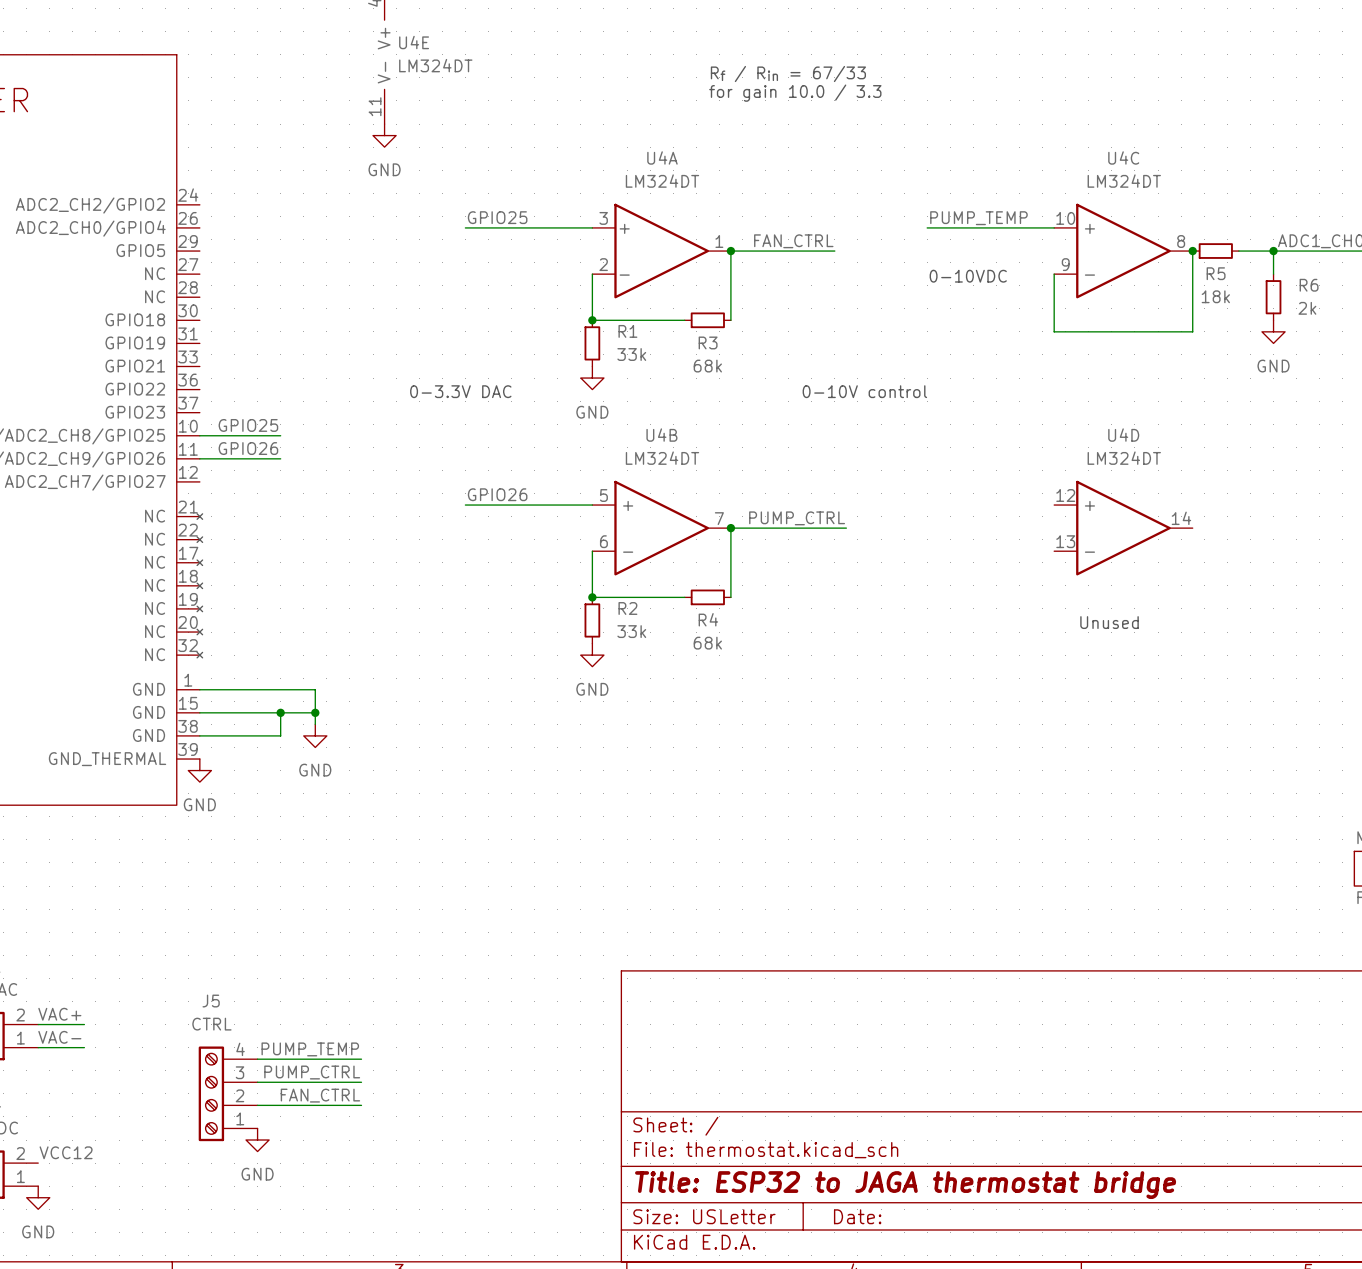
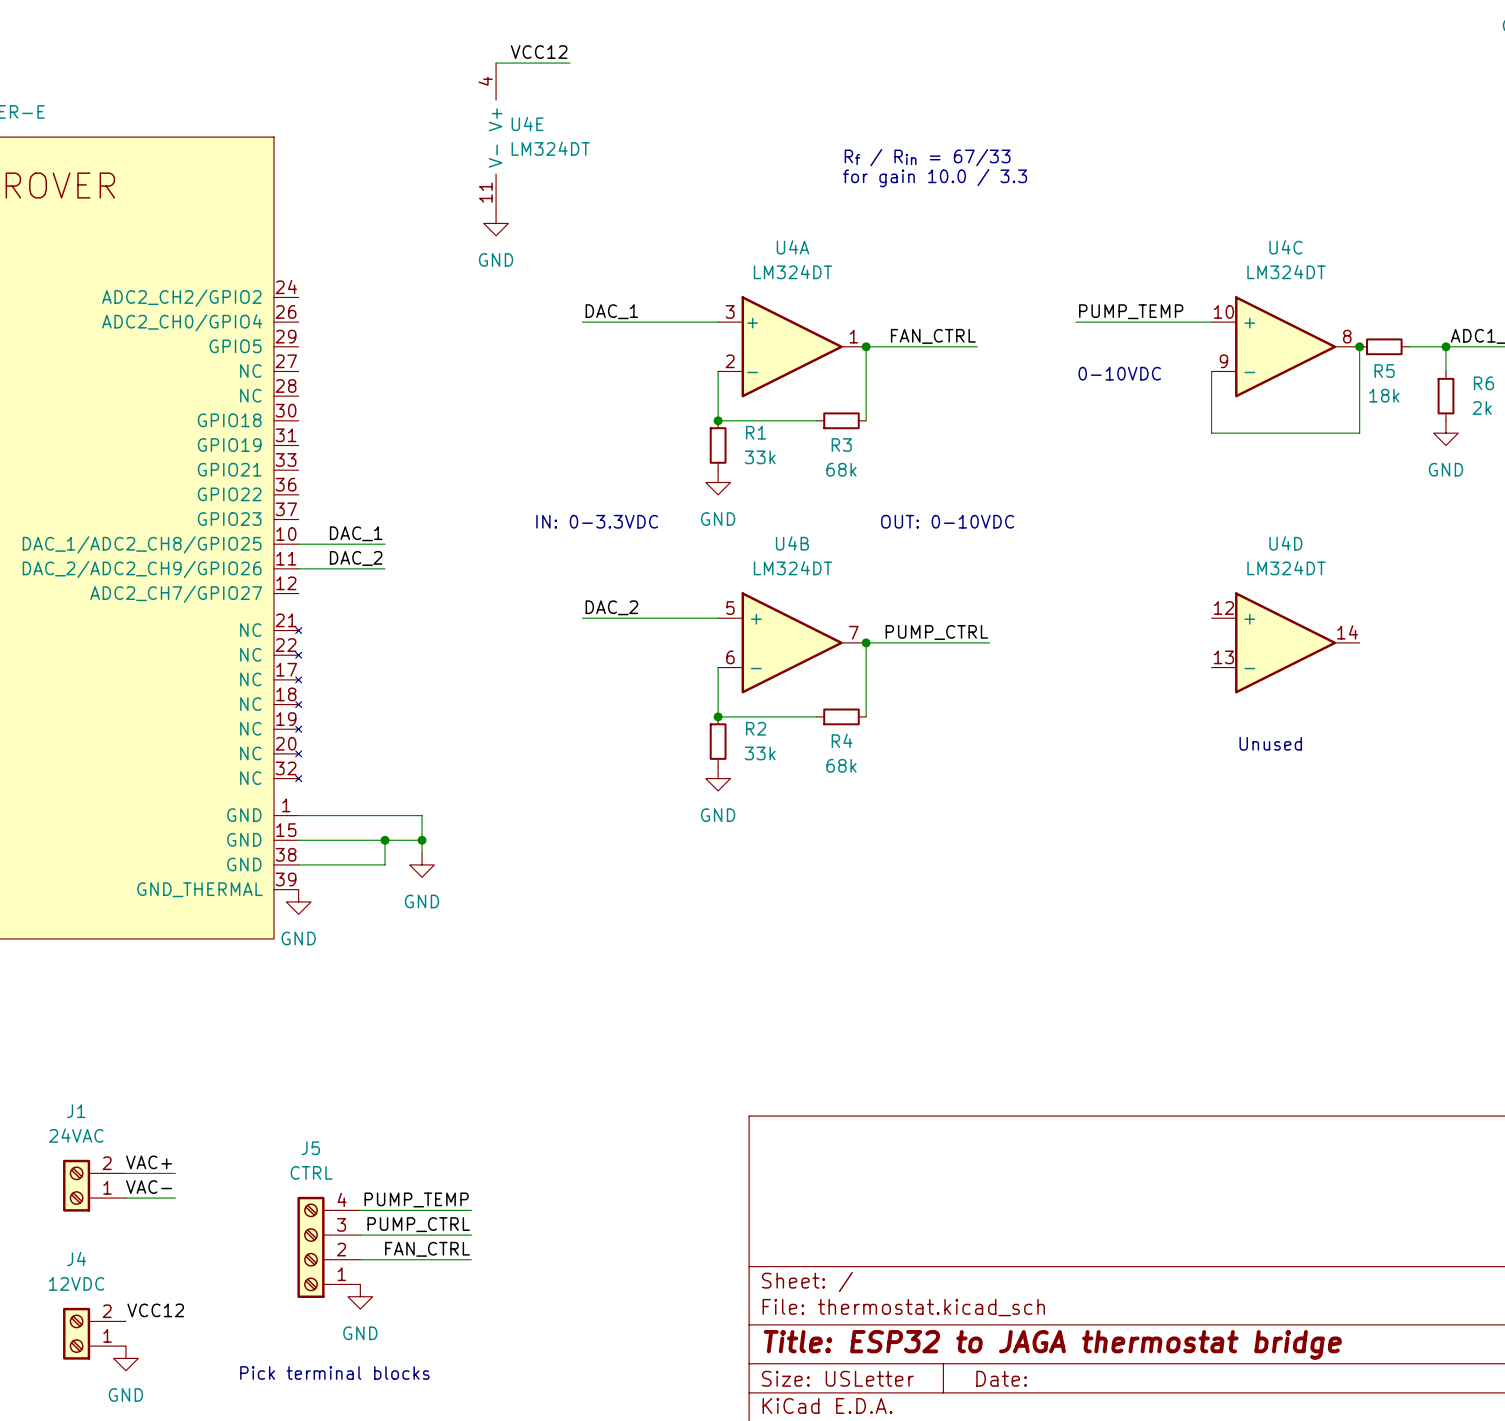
label: GPIO25 (497, 217) -> DAC_1 (611, 311)
text: 0-3.3V DAC (460, 391) -> IN: 0-3.3VDC (597, 521)
text: 0-10V control (864, 391) -> none
text: none -> OUT: 0-10VDC (947, 521)
label: GPIO25 (248, 425) -> DAC_1 (356, 533)
label: GPIO26 (248, 448) -> DAC_2 (356, 558)
label: GPIO26 (497, 494) -> DAC_2 (611, 607)
text: none -> Pick terminal blocks (334, 1372)

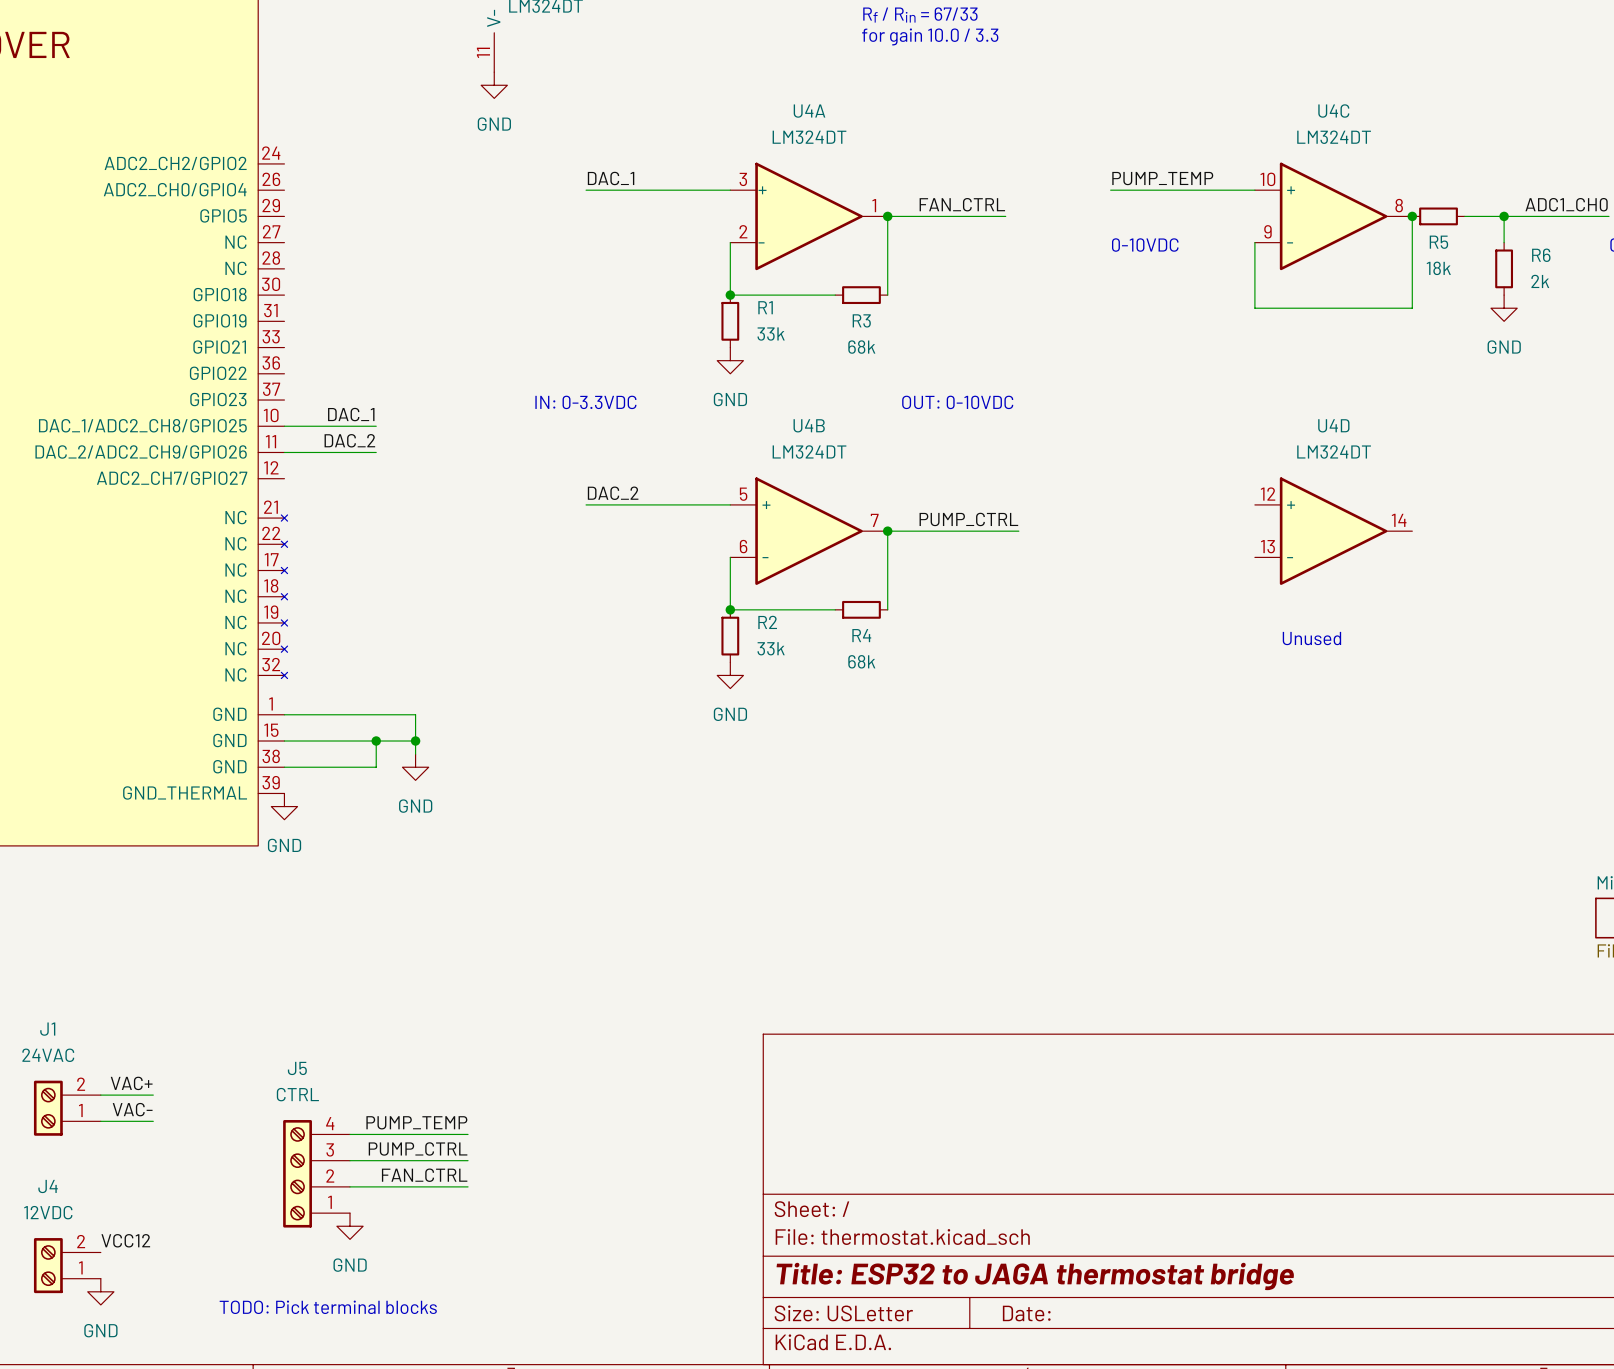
text: Pick terminal blocks (334, 1372) -> TODO: Pick terminal blocks (328, 1307)

